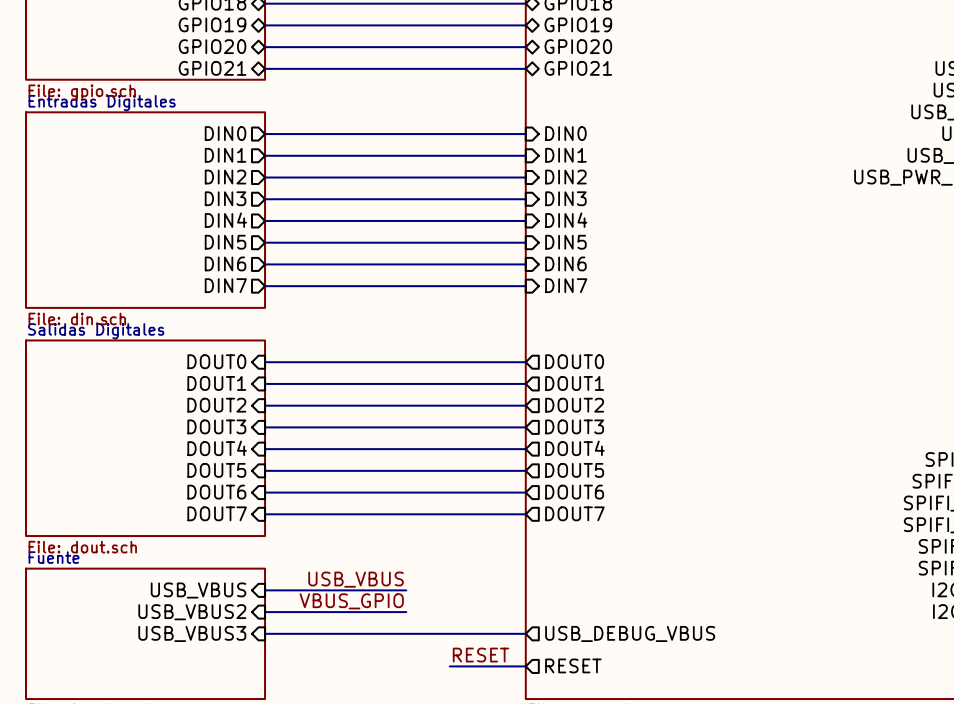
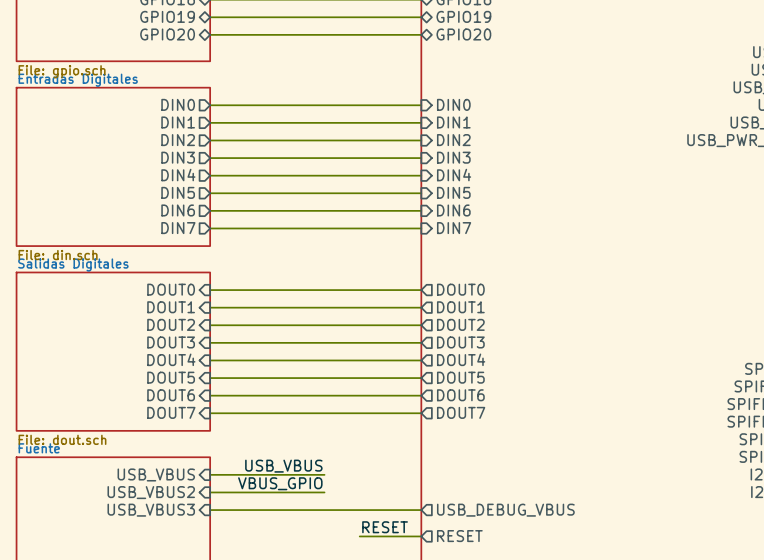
sheet pin: GPIO21 (212, 68) -> none
wire: (265, 68) (525, 68) -> none
sheet pin: GPIO21 (578, 68) -> none

